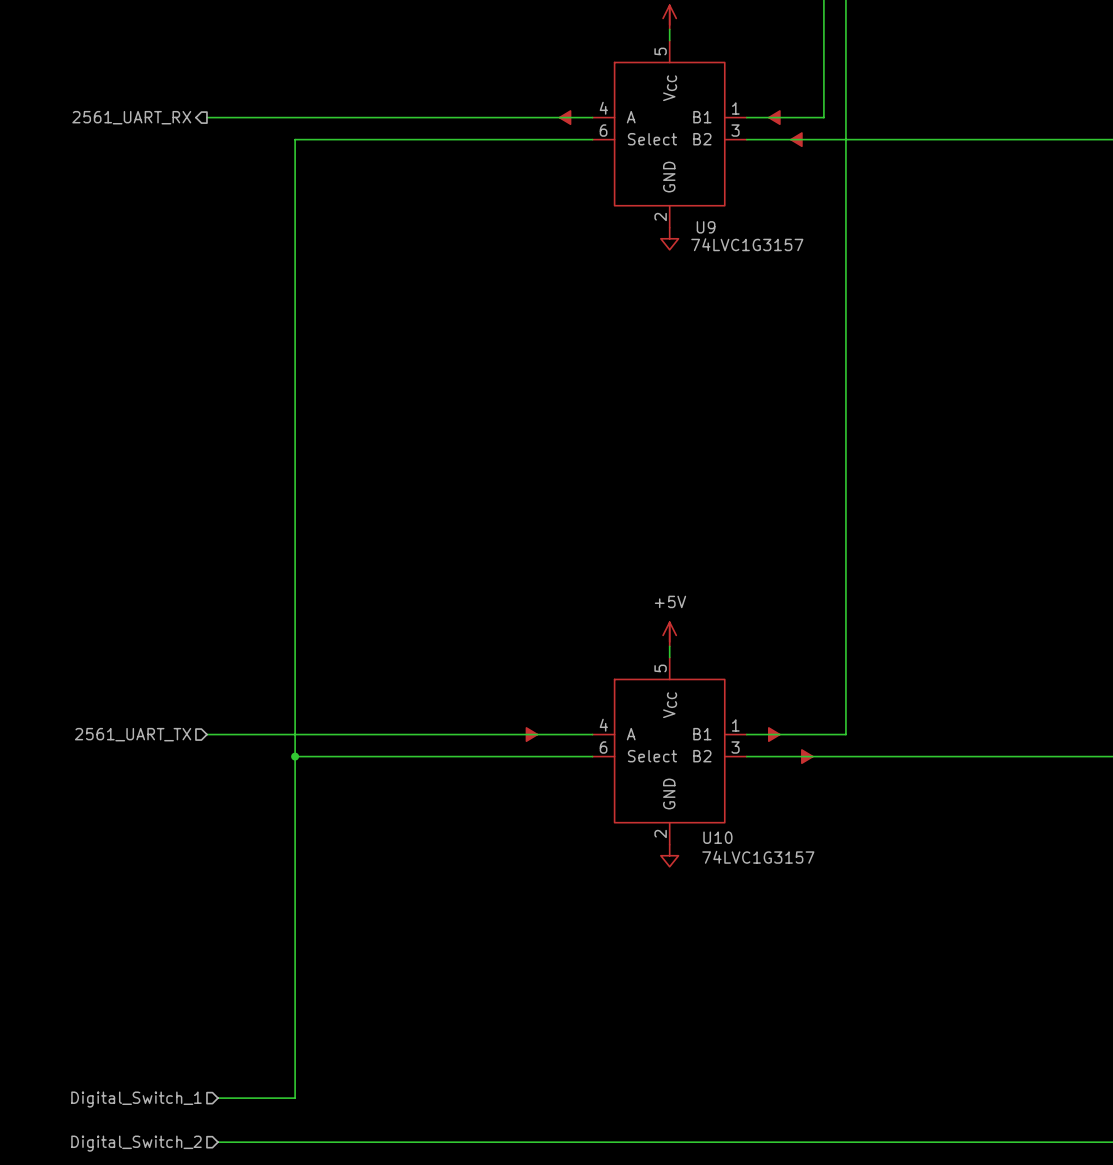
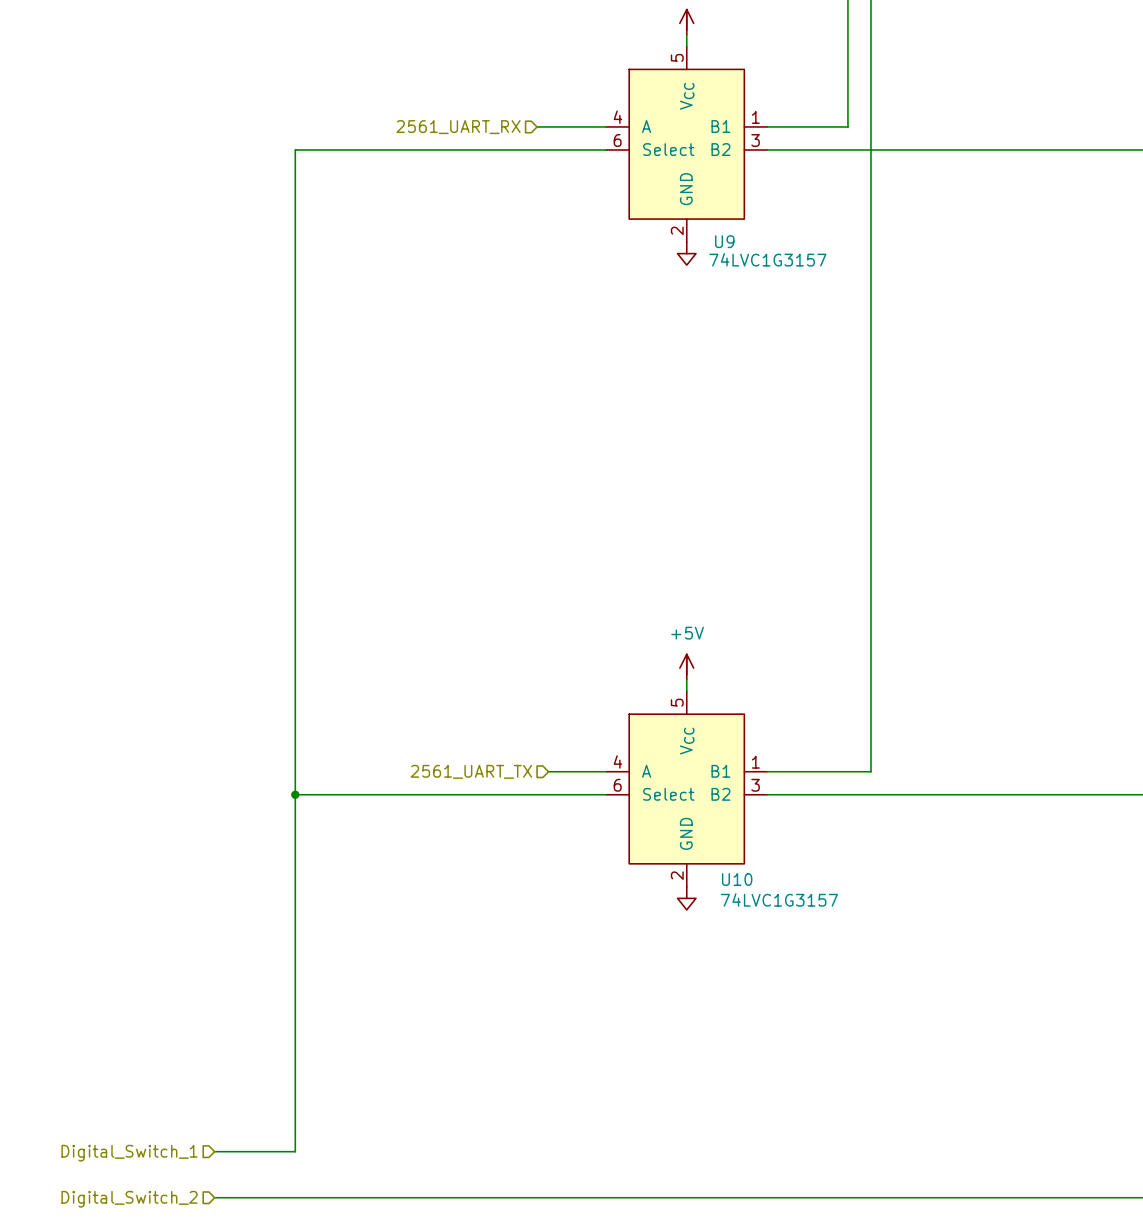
hierarchical label: 2561_UART_RX (131, 117) -> none
wire: (206, 117) (526, 117) -> none
hierarchical label: none -> 2561_UART_RX (458, 127)
part: (565, 117) -> none
part: (774, 117) -> none
part: (796, 139) -> none
hierarchical label: 2561_UART_TX (133, 734) -> none
wire: (206, 734) (537, 734) -> none
hierarchical label: none -> 2561_UART_TX (471, 771)
part: (531, 734) -> none
part: (774, 734) -> none
part: (807, 756) -> none

